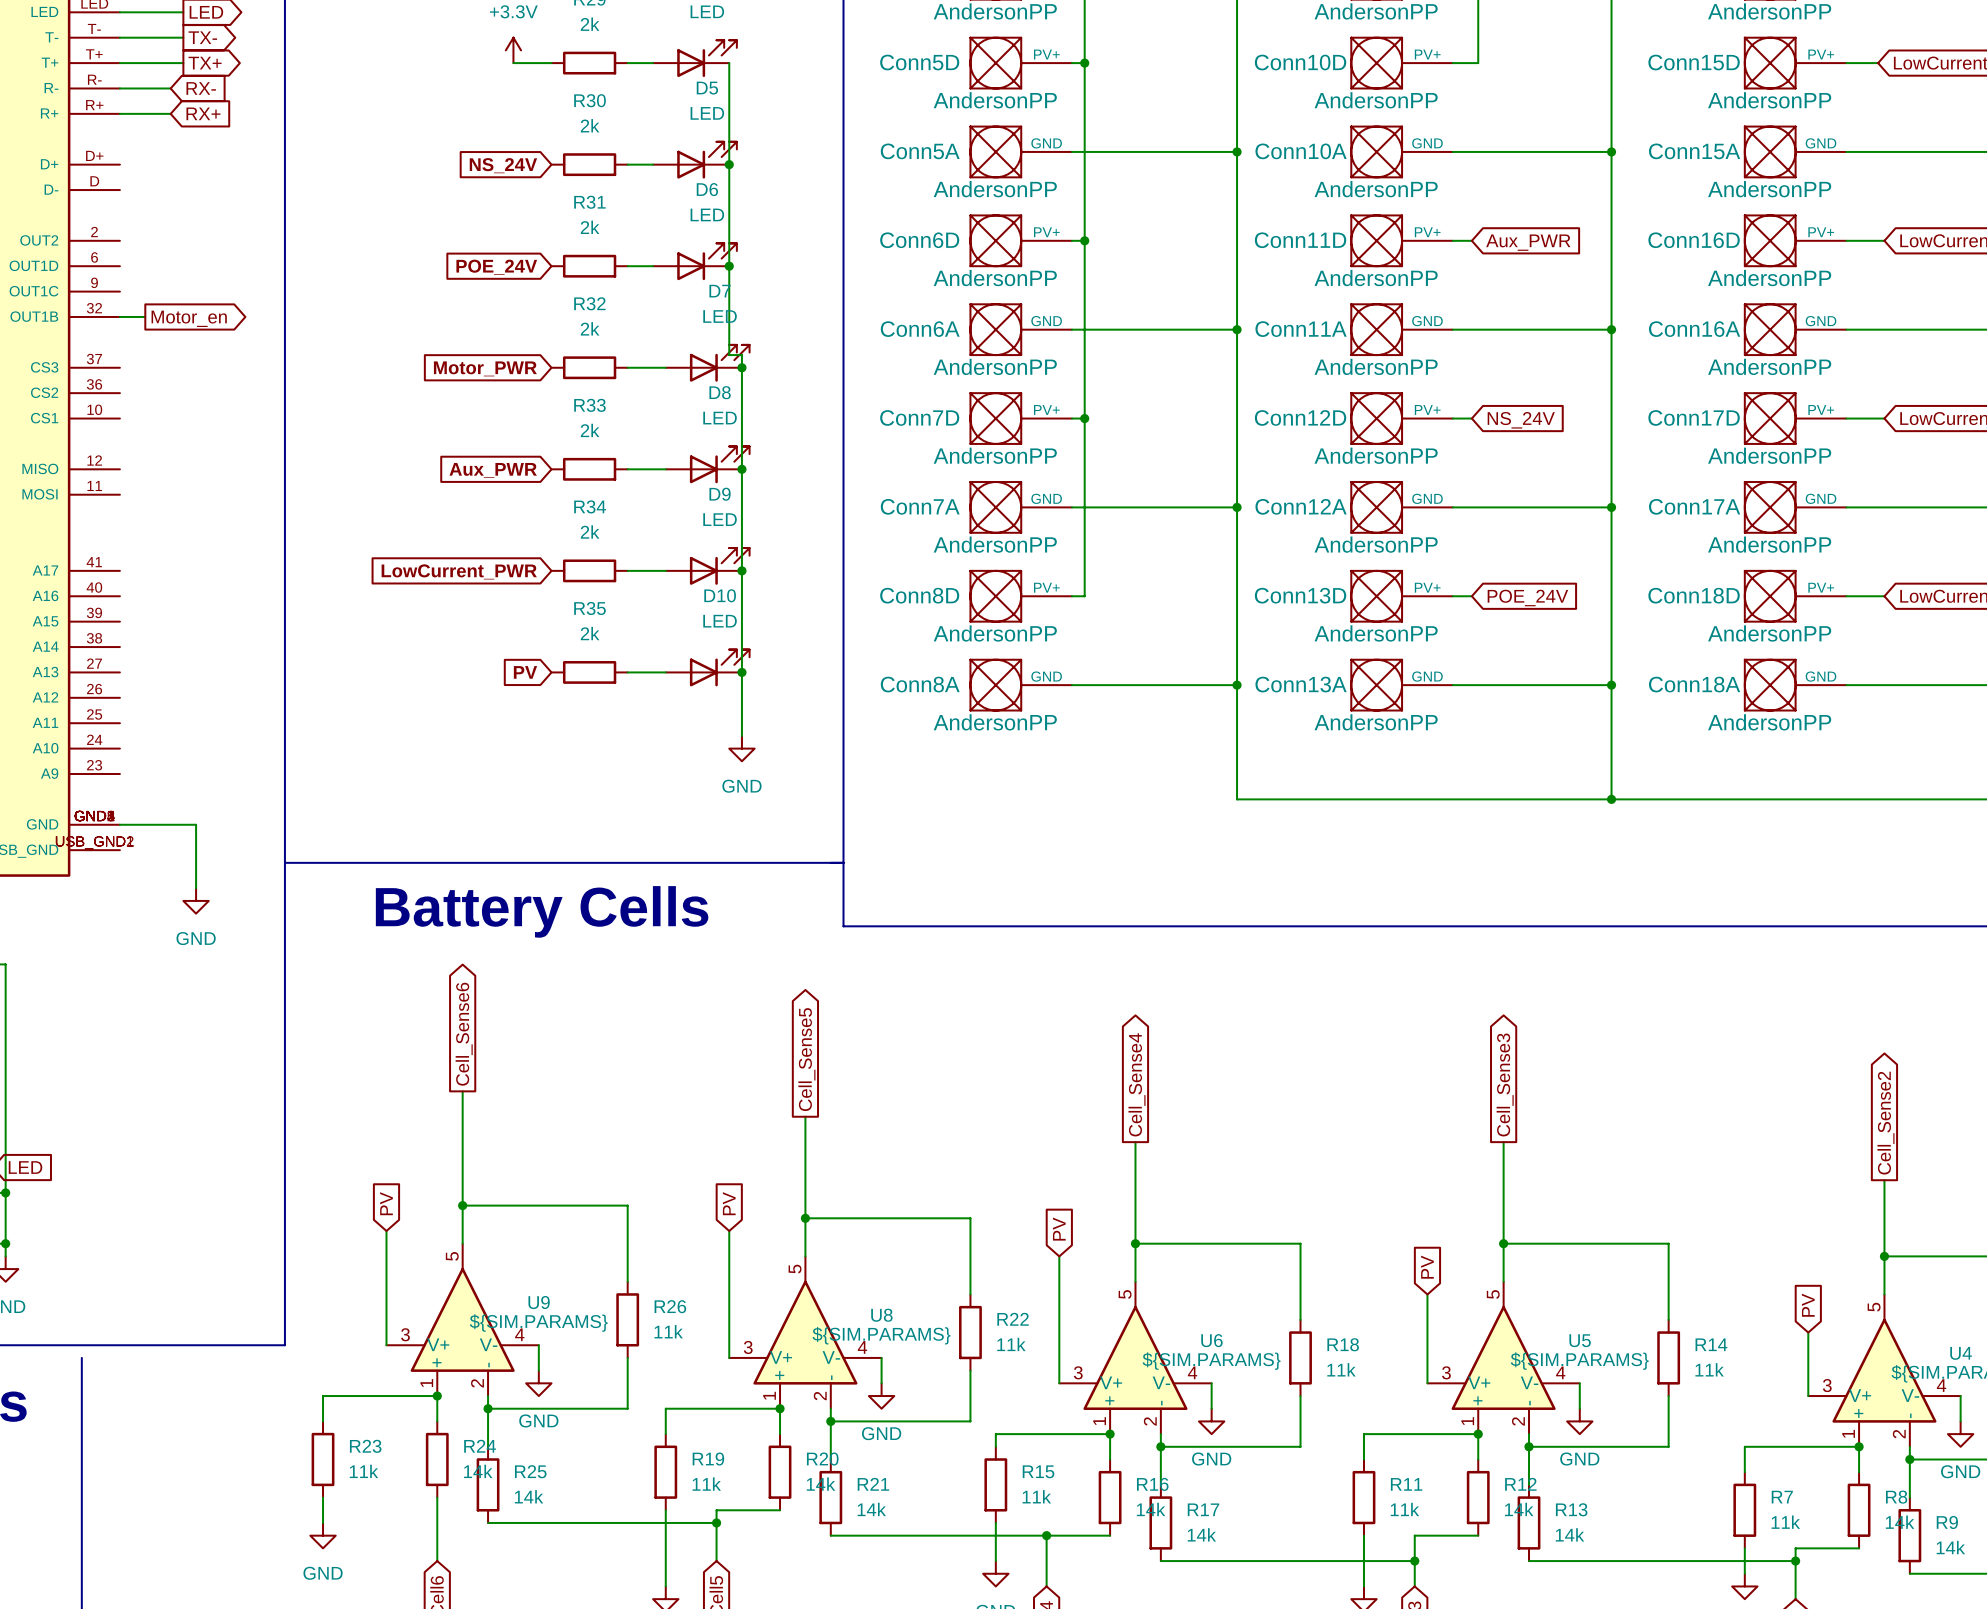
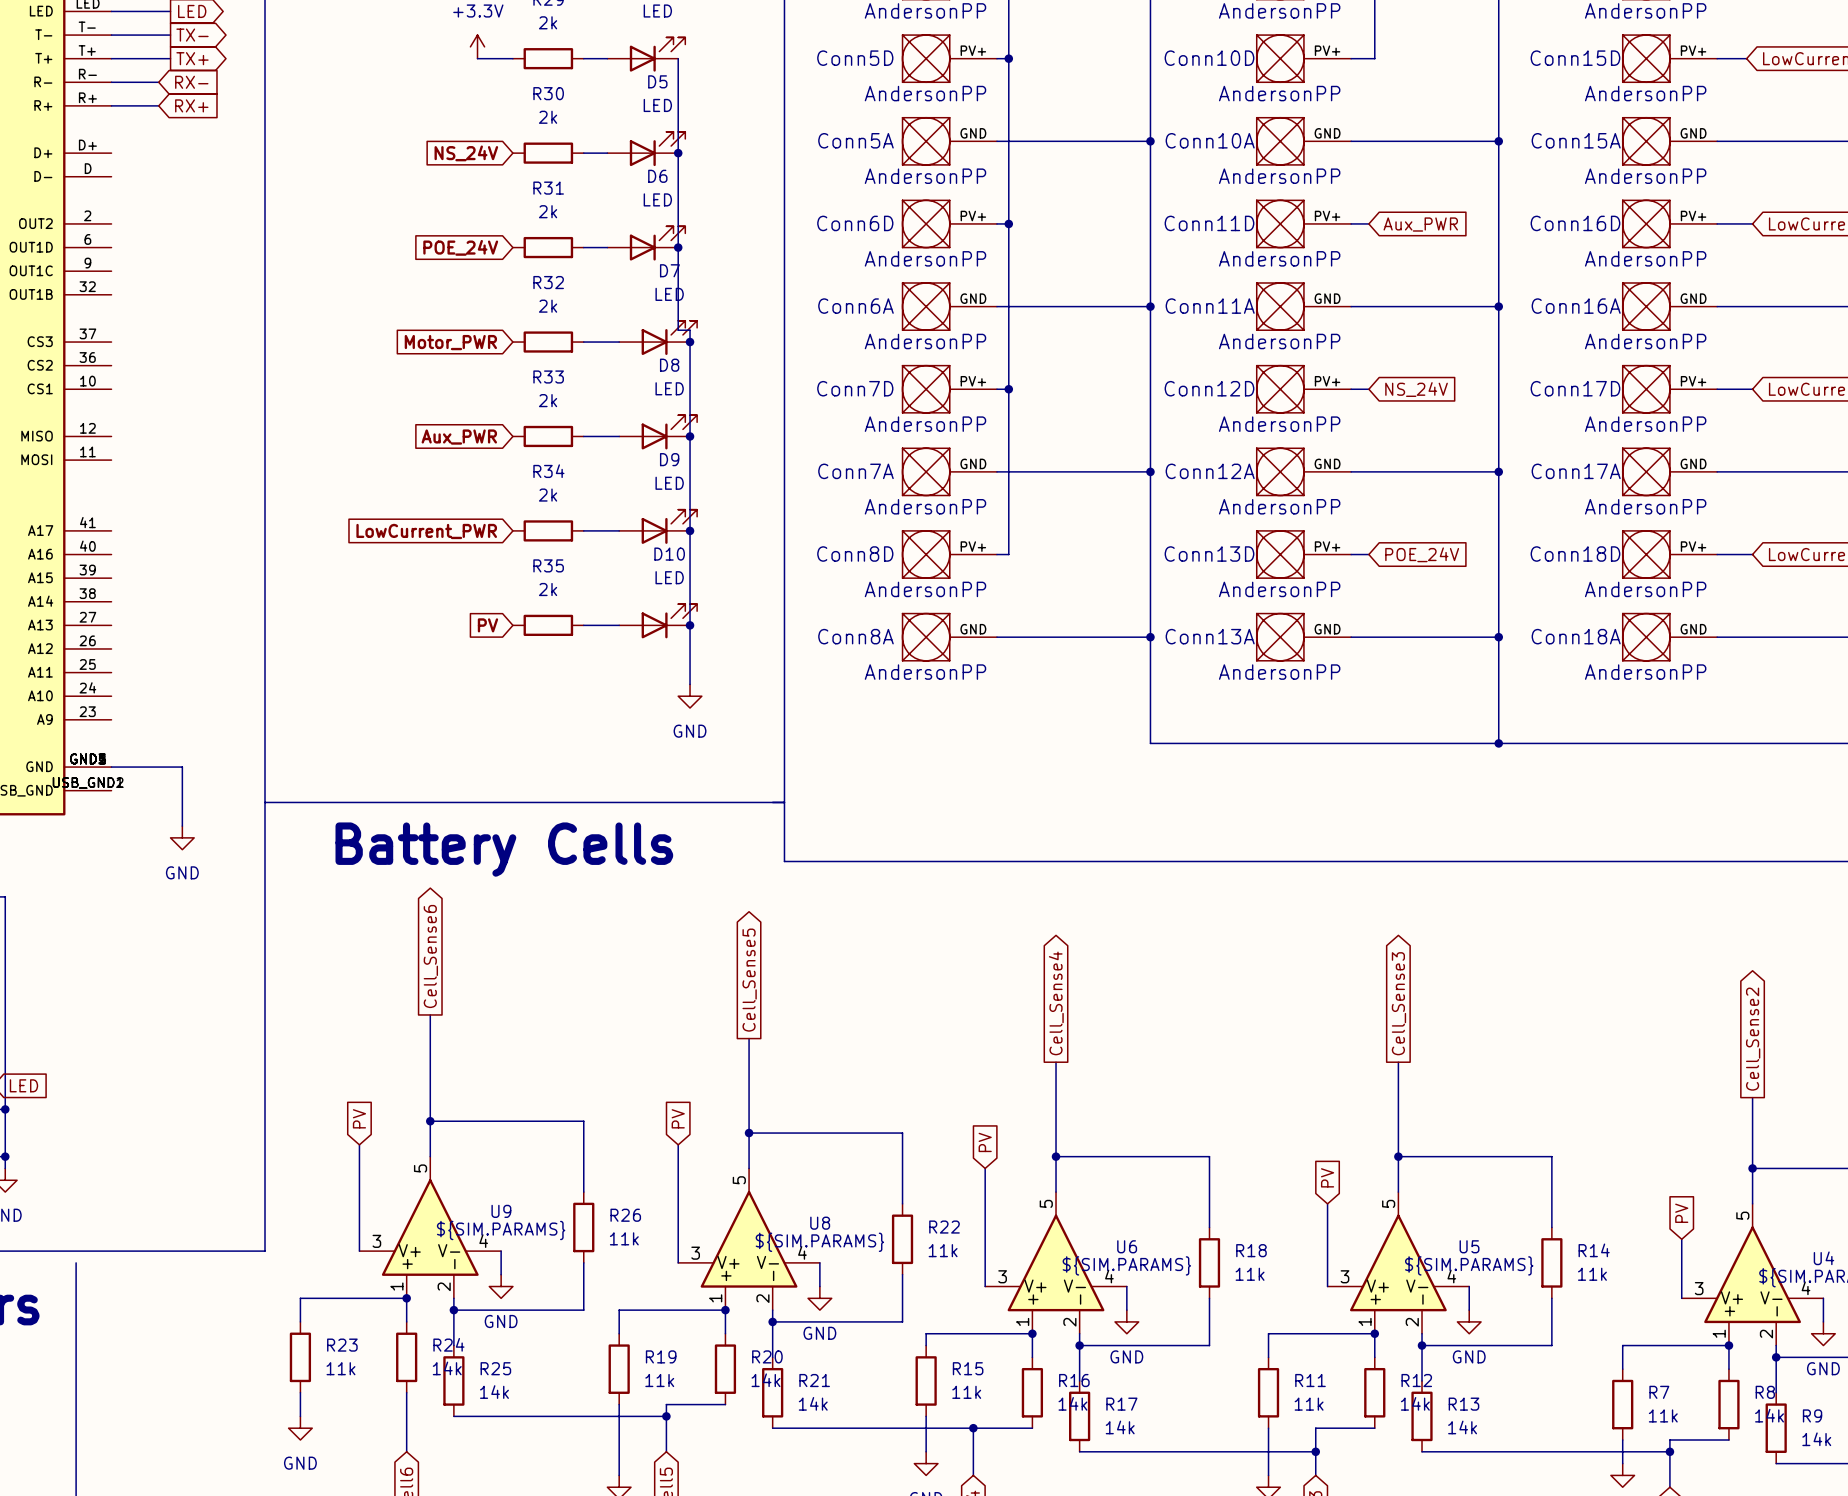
wire: (119, 316) (145, 316) -> none
global label: Motor_en (189, 318) -> none

